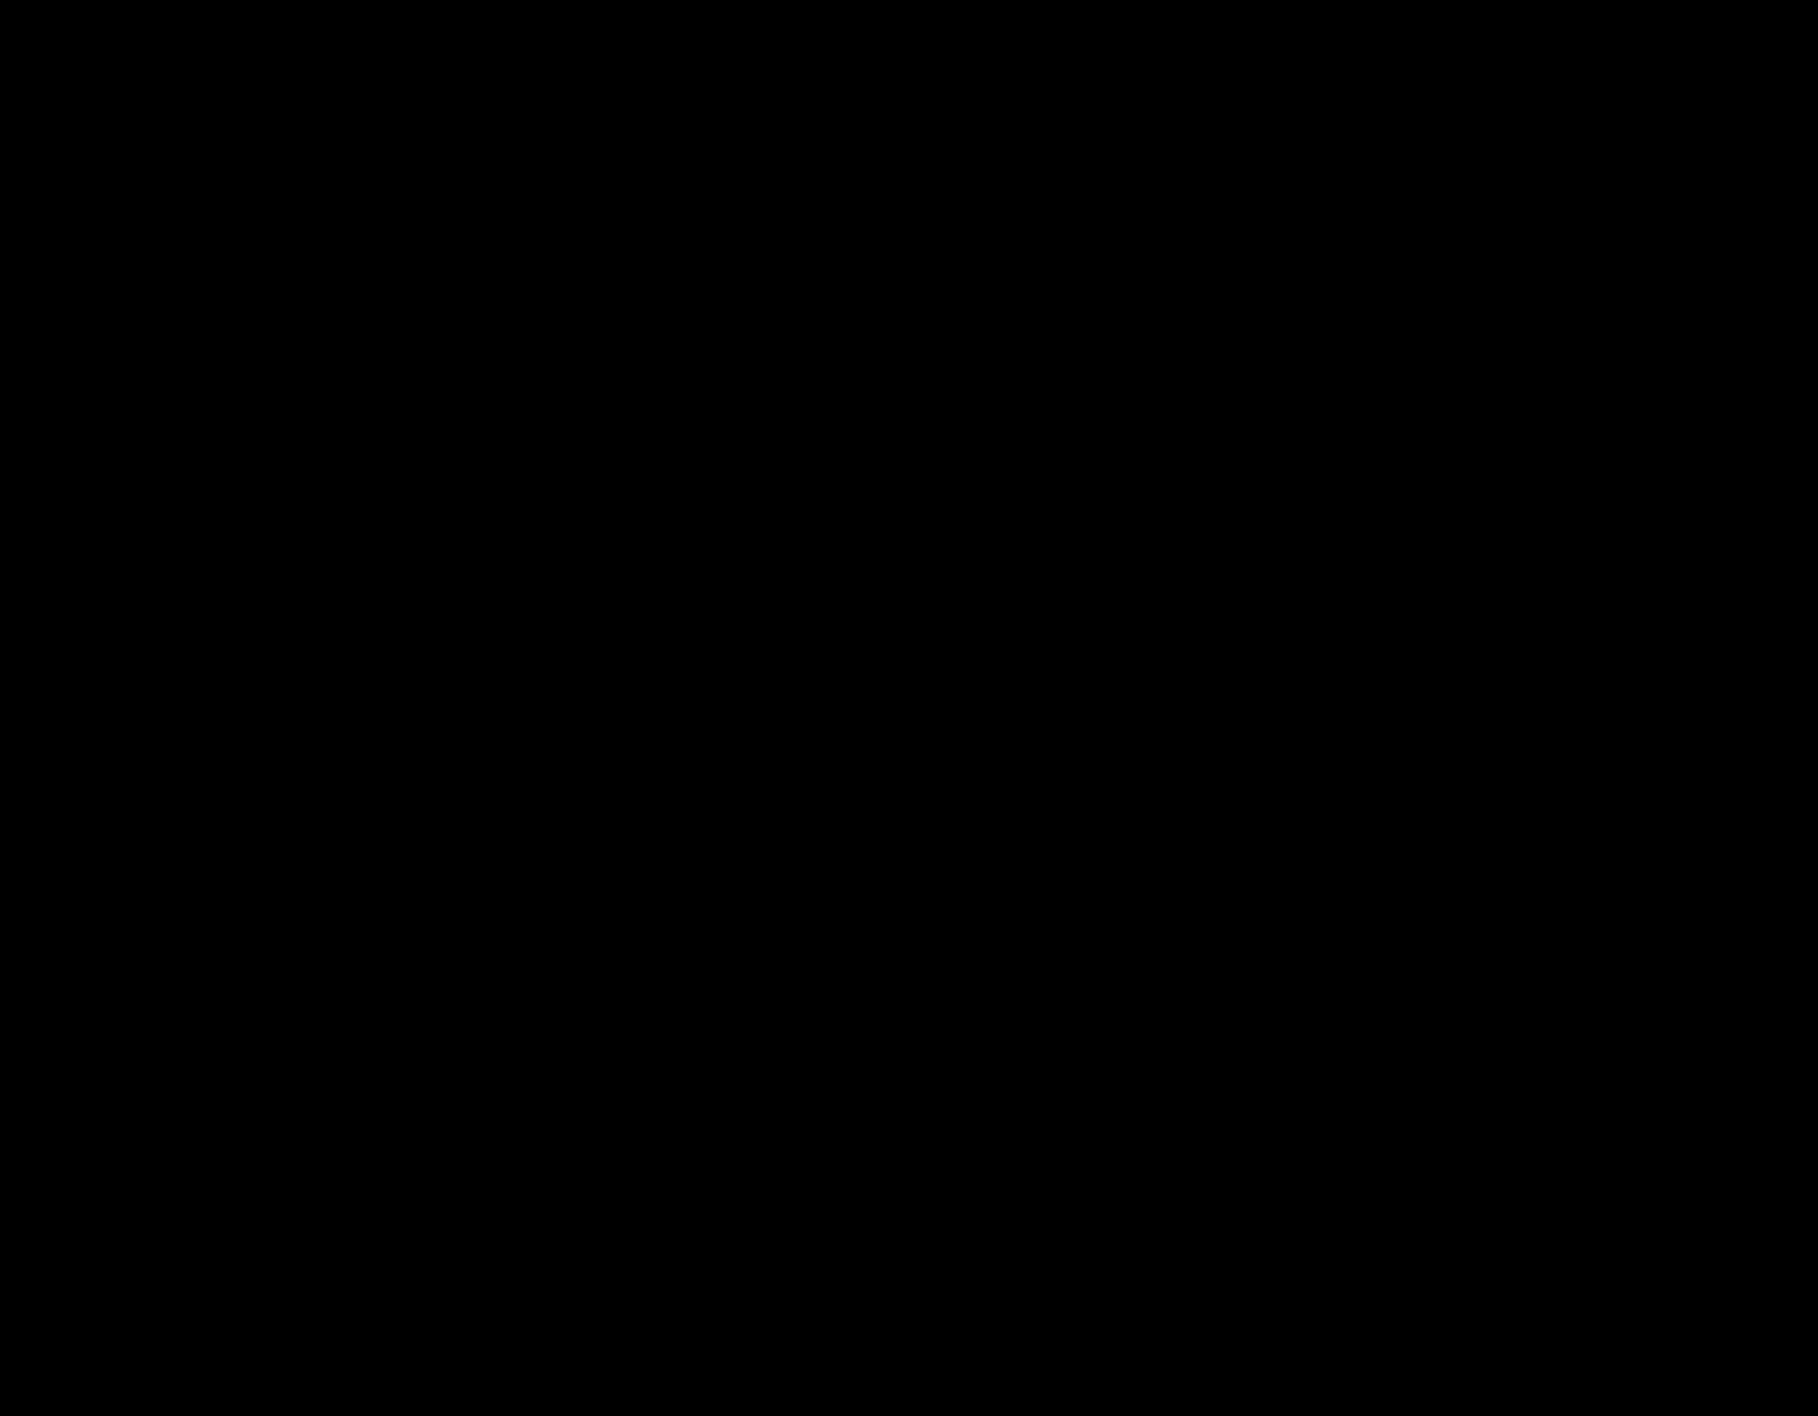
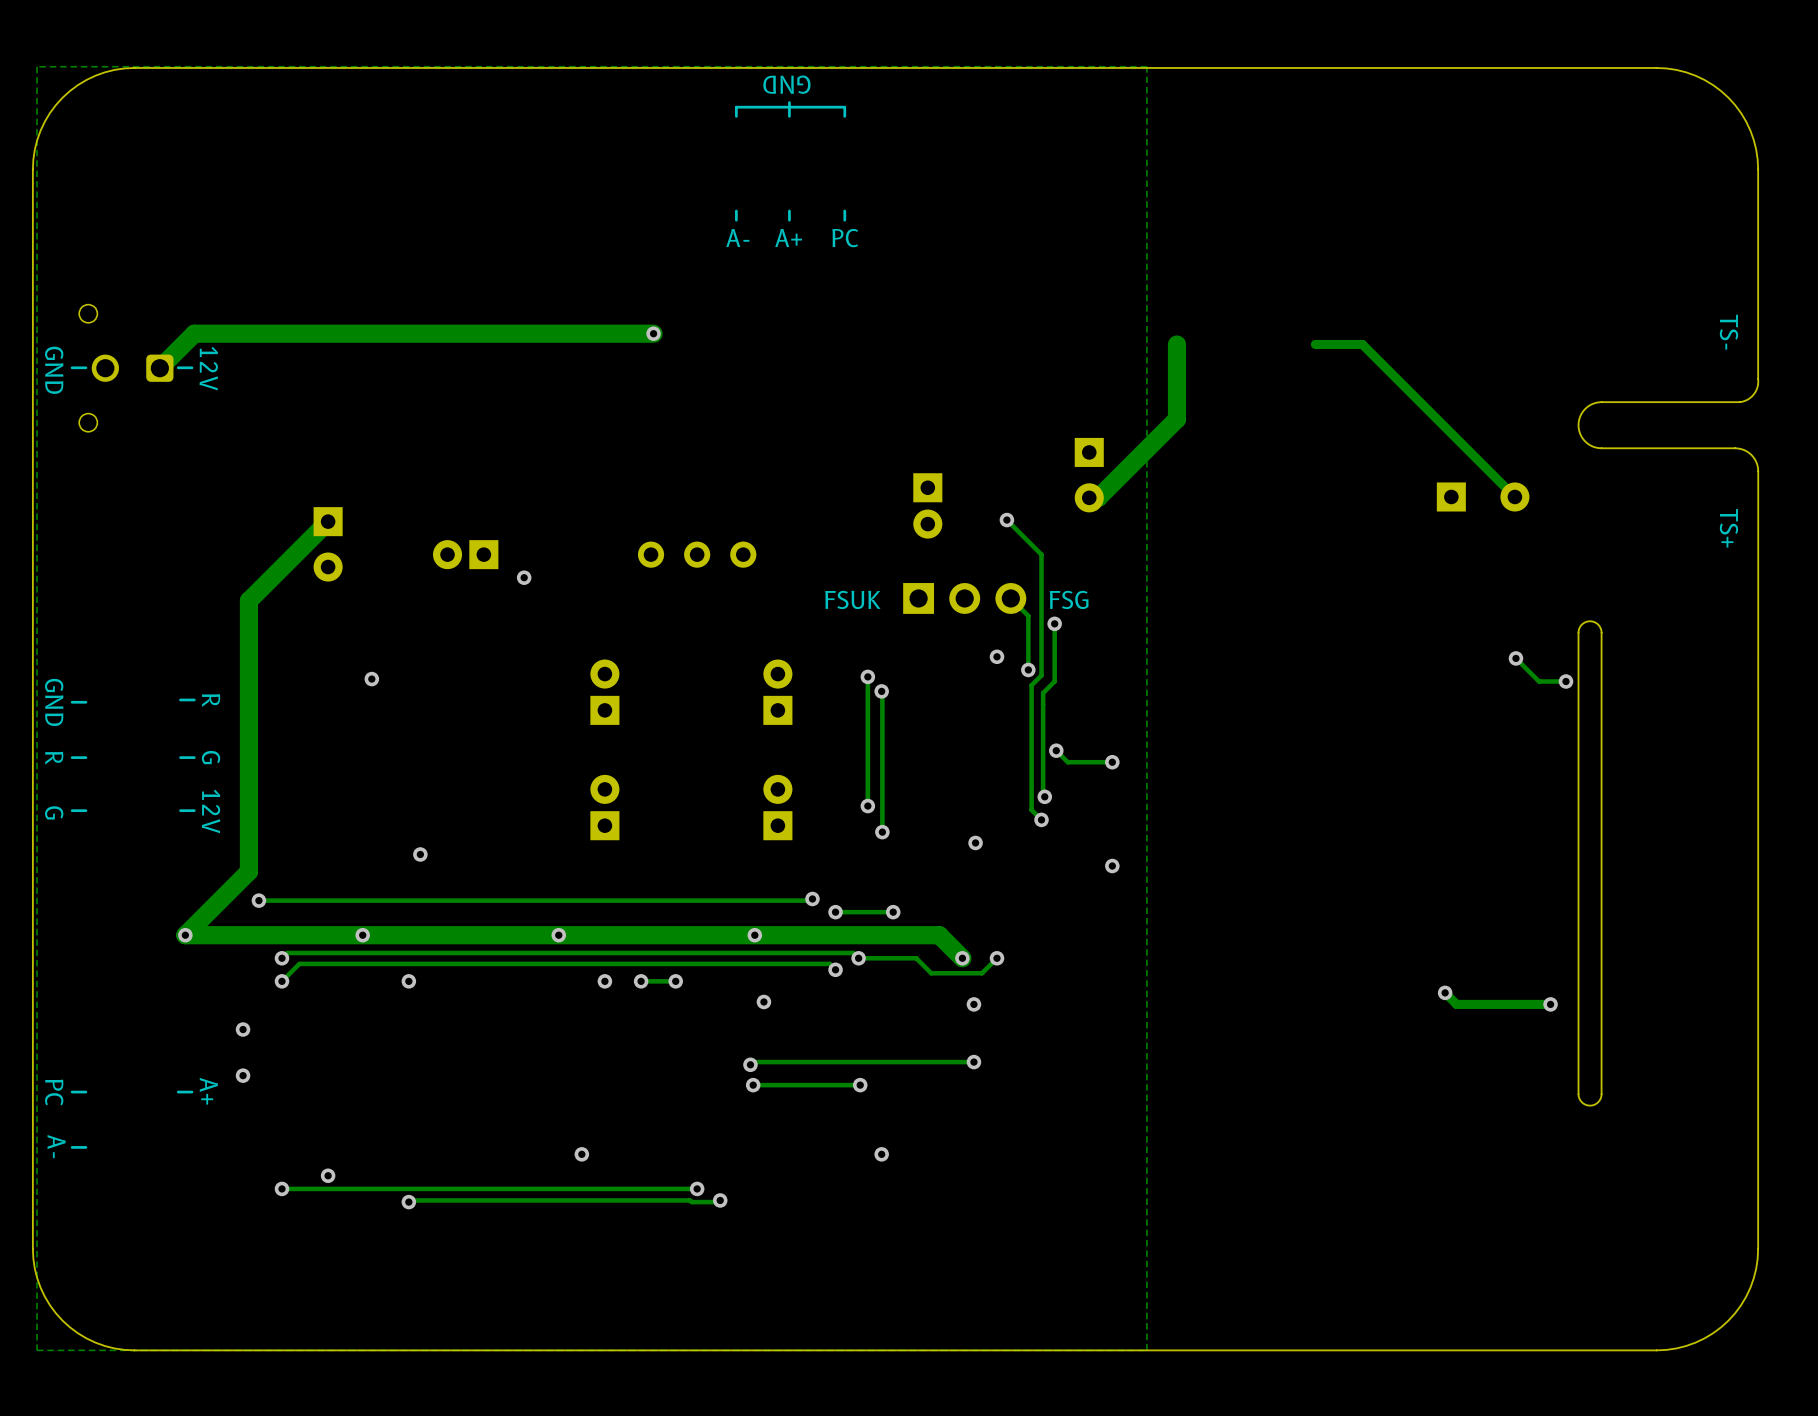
zone outline: none -> (1146, 66) (1146, 1350) (36, 1350) (36, 66) (1146, 66)
board edge: none -> (1656, 67) (134, 67) (104, 72) (86, 79) (69, 91) (49, 113) (40, 130) (34, 149) (32, 169) (32, 1248) (37, 1278) (44, 1296) (55, 1313) (77, 1333) (95, 1342) (114, 1348) (134, 1350) (1656, 1350) (1686, 1346) (1704, 1338) (1721, 1327) (1735, 1313) (1746, 1296) (1753, 1278) (1758, 1248) (1758, 468) (1751, 455) (1737, 448) (1596, 447) (1582, 438) (1578, 425) (1582, 412) (1596, 402) (1739, 402) (1750, 397) (1757, 386) (1758, 169) (1753, 139) (1746, 121) (1735, 105) (1713, 85) (1686, 72) (1656, 67)
text: none -> GND (786, 84)
line: none -> (789, 102) (789, 116)
line: none -> (844, 116) (844, 107) (736, 107) (736, 116)
line: none -> (736, 210) (736, 220)
line: none -> (789, 210) (789, 220)
line: none -> (844, 210) (844, 220)
text: none -> A- (737, 237)
text: none -> A+ (788, 237)
text: none -> PC (845, 238)
text: none -> TS- (1728, 332)
track: none -> (653, 333) (194, 333) (159, 368)
via: none -> (653, 333)
track: none -> (1176, 344) (1176, 419) (1098, 497) (1089, 497)
track: none -> (1315, 344) (1362, 344) (1514, 496)
line: none -> (85, 367) (72, 367)
line: none -> (192, 367) (178, 367)
part: none -> (126, 368)
text: none -> 12V (208, 368)
text: none -> GND (54, 370)
part: none -> (1089, 475)
part: none -> (1483, 496)
part: none -> (927, 505)
track: none -> (1006, 520) (1041, 554) (1041, 675) (1031, 685) (1031, 809) (1041, 819)
via: none -> (1006, 520)
track: none -> (328, 521) (248, 600) (248, 871) (185, 935) (939, 935) (962, 958)
text: none -> TS+ (1728, 528)
part: none -> (328, 544)
part: none -> (465, 554)
part: none -> (697, 554)
via: none -> (524, 577)
part: none -> (964, 598)
track: none -> (1010, 598) (1028, 615) (1028, 669)
text: none -> FSUK (852, 599)
text: none -> FSG (1069, 599)
track: none -> (1054, 623) (1054, 681) (1043, 693) (1043, 795) (1044, 796)
via: none -> (1054, 623)
board edge: none -> (1601, 632) (1601, 1094) (1598, 1101) (1590, 1105) (1581, 1101) (1578, 1094) (1578, 632) (1581, 625) (1590, 621) (1598, 625) (1601, 632)
via: none -> (997, 656)
track: none -> (1515, 658) (1539, 681) (1566, 681)
via: none -> (1515, 658)
via: none -> (1028, 669)
track: none -> (867, 676) (867, 806)
via: none -> (867, 676)
via: none -> (371, 679)
via: none -> (1566, 681)
track: none -> (881, 691) (882, 832)
via: none -> (881, 691)
part: none -> (604, 692)
part: none -> (777, 692)
line: none -> (194, 699) (180, 699)
text: none -> R (211, 700)
text: none -> GND (54, 702)
line: none -> (85, 702) (72, 702)
track: none -> (1056, 750) (1067, 762) (1112, 762)
via: none -> (1056, 750)
line: none -> (85, 757) (72, 757)
line: none -> (194, 757) (180, 757)
text: none -> G (211, 757)
text: none -> R (54, 758)
via: none -> (1112, 762)
via: none -> (1044, 796)
via: none -> (867, 806)
part: none -> (604, 807)
part: none -> (777, 807)
line: none -> (85, 810) (72, 810)
line: none -> (194, 810) (180, 810)
text: none -> 12V (211, 811)
text: none -> G (54, 812)
via: none -> (1041, 819)
via: none -> (882, 832)
via: none -> (975, 842)
via: none -> (420, 854)
via: none -> (1112, 866)
track: none -> (812, 898) (810, 900) (258, 900)
via: none -> (812, 898)
via: none -> (258, 900)
via: none -> (835, 912)
track: none -> (893, 912) (835, 912)
via: none -> (893, 912)
via: none -> (185, 935)
via: none -> (362, 935)
via: none -> (558, 935)
via: none -> (754, 935)
via: none -> (281, 958)
via: none -> (858, 958)
via: none -> (962, 958)
track: none -> (997, 958) (982, 973) (931, 973) (916, 958) (858, 958) (853, 953) (287, 953) (281, 958)
via: none -> (997, 958)
track: none -> (835, 969) (829, 963) (299, 963) (281, 981)
via: none -> (835, 969)
via: none -> (281, 981)
via: none -> (408, 981)
via: none -> (604, 981)
via: none -> (641, 981)
track: none -> (675, 981) (641, 981)
via: none -> (675, 981)
track: none -> (1445, 992) (1456, 1004) (1550, 1004)
via: none -> (1445, 992)
via: none -> (763, 1001)
via: none -> (973, 1004)
via: none -> (1550, 1004)
via: none -> (243, 1029)
track: none -> (973, 1062) (753, 1062) (750, 1064)
via: none -> (973, 1062)
via: none -> (750, 1064)
via: none -> (243, 1075)
via: none -> (753, 1085)
track: none -> (860, 1085) (753, 1085)
via: none -> (860, 1085)
text: none -> A+ (208, 1091)
text: none -> PC (54, 1092)
line: none -> (85, 1092) (72, 1092)
line: none -> (192, 1092) (178, 1092)
text: none -> A- (56, 1146)
line: none -> (85, 1147) (72, 1147)
via: none -> (581, 1154)
via: none -> (881, 1154)
via: none -> (328, 1175)
via: none -> (281, 1188)
track: none -> (697, 1188) (281, 1188)
via: none -> (697, 1188)
track: none -> (720, 1200) (718, 1202) (691, 1202) (690, 1200) (410, 1200) (408, 1202)
via: none -> (720, 1200)
via: none -> (408, 1202)

